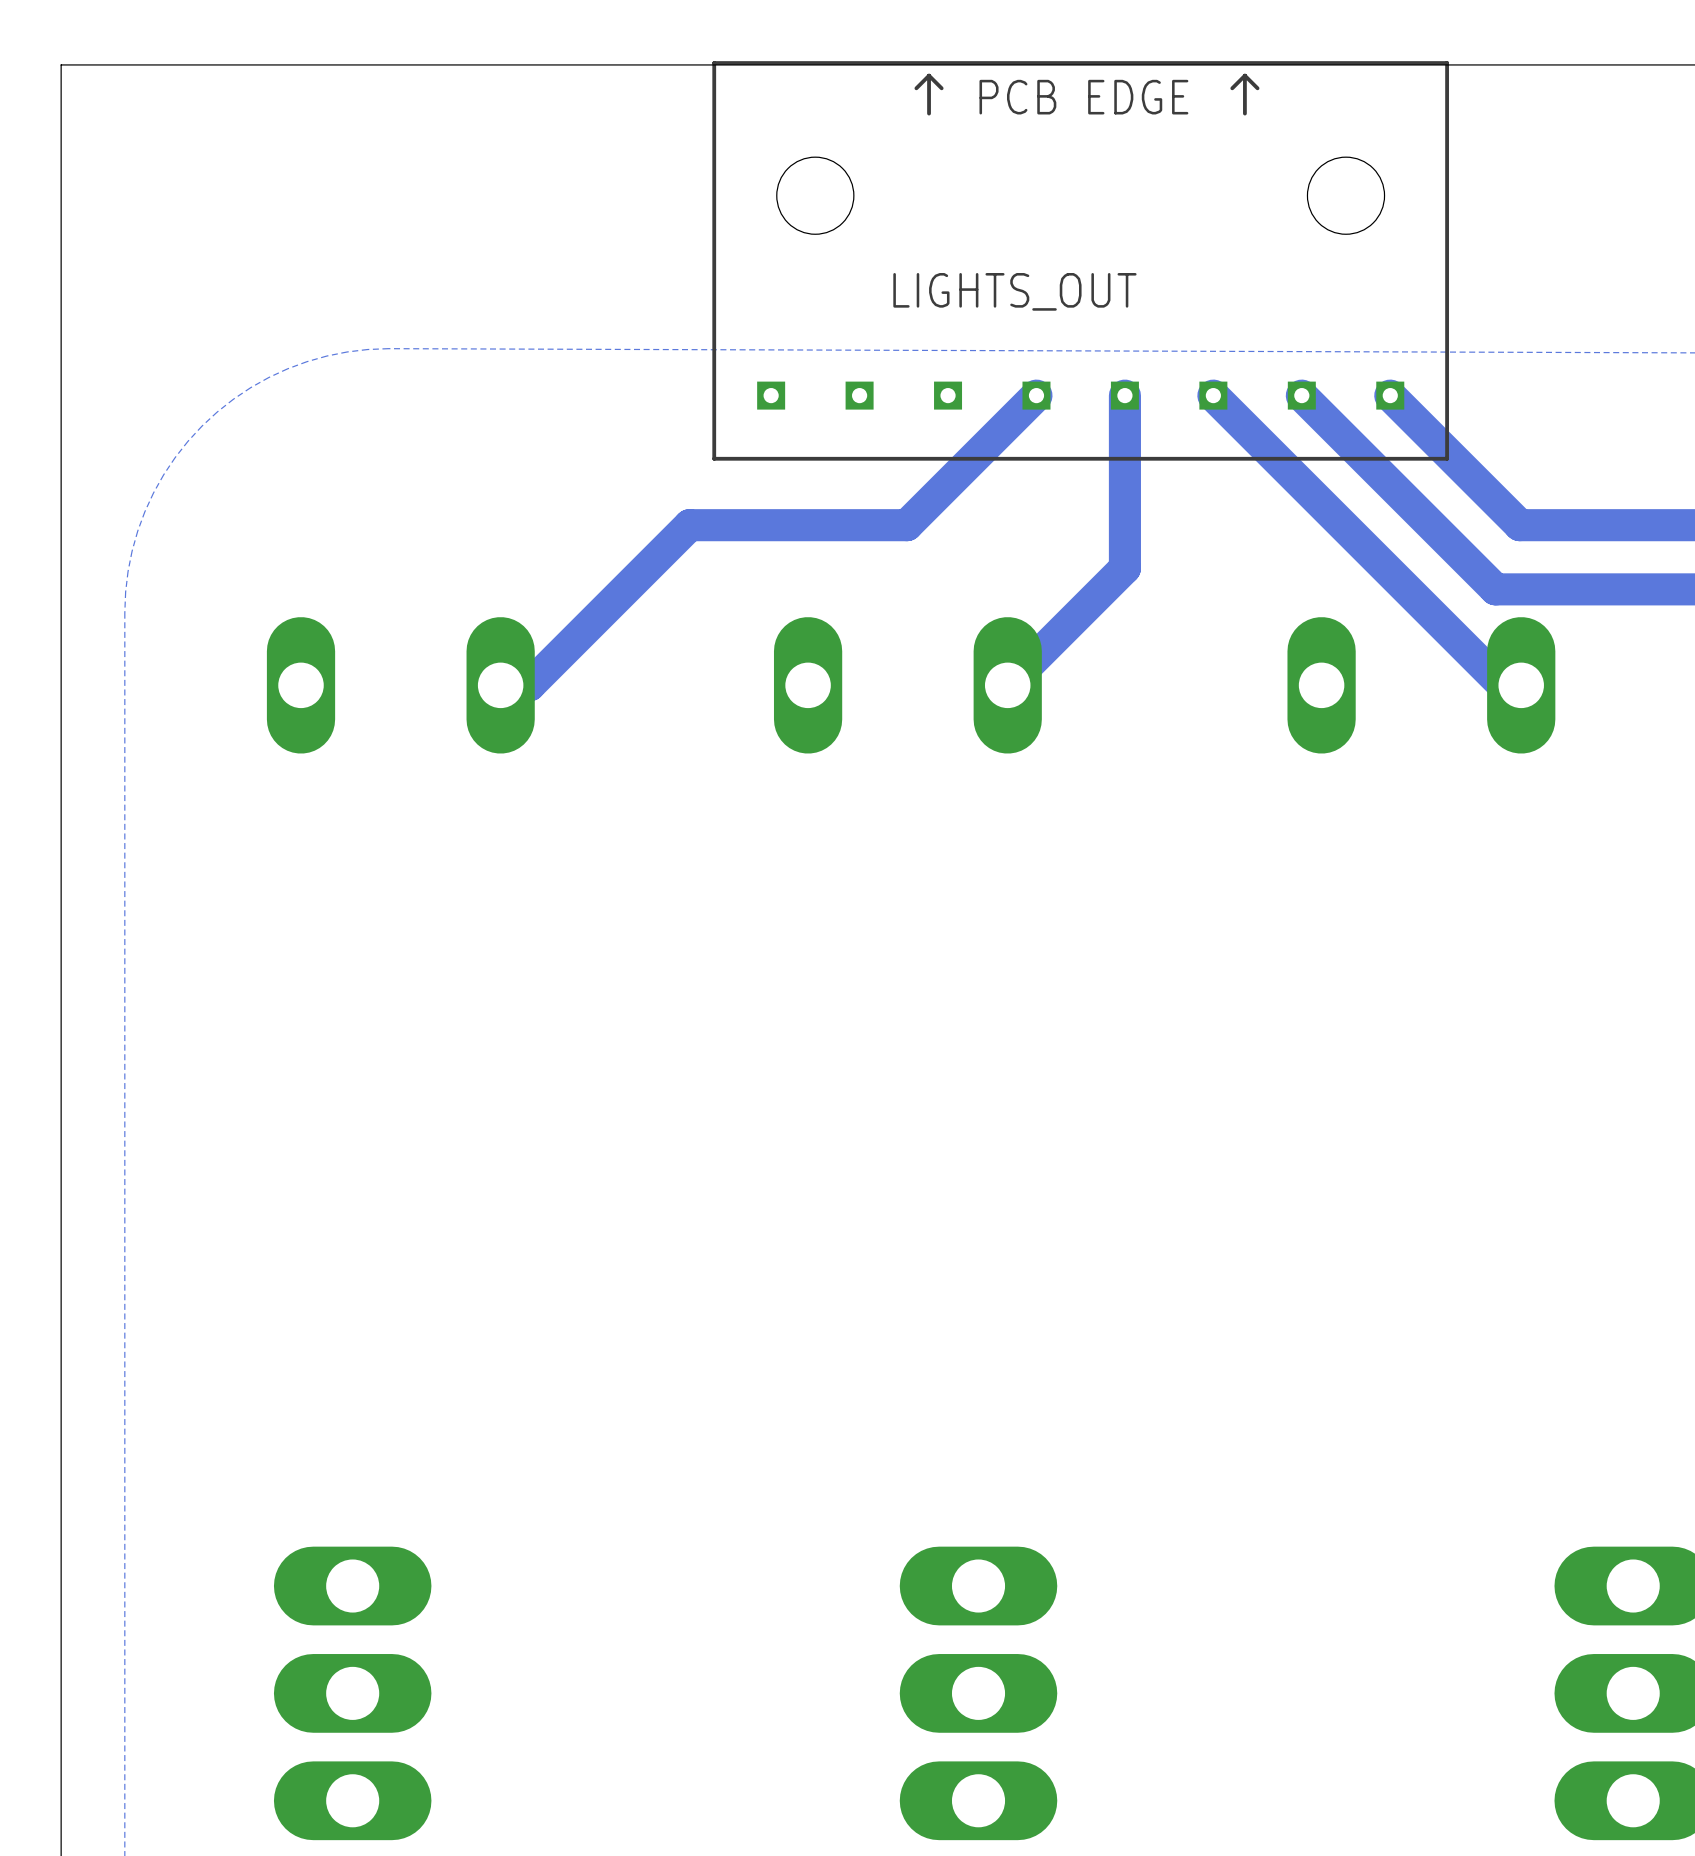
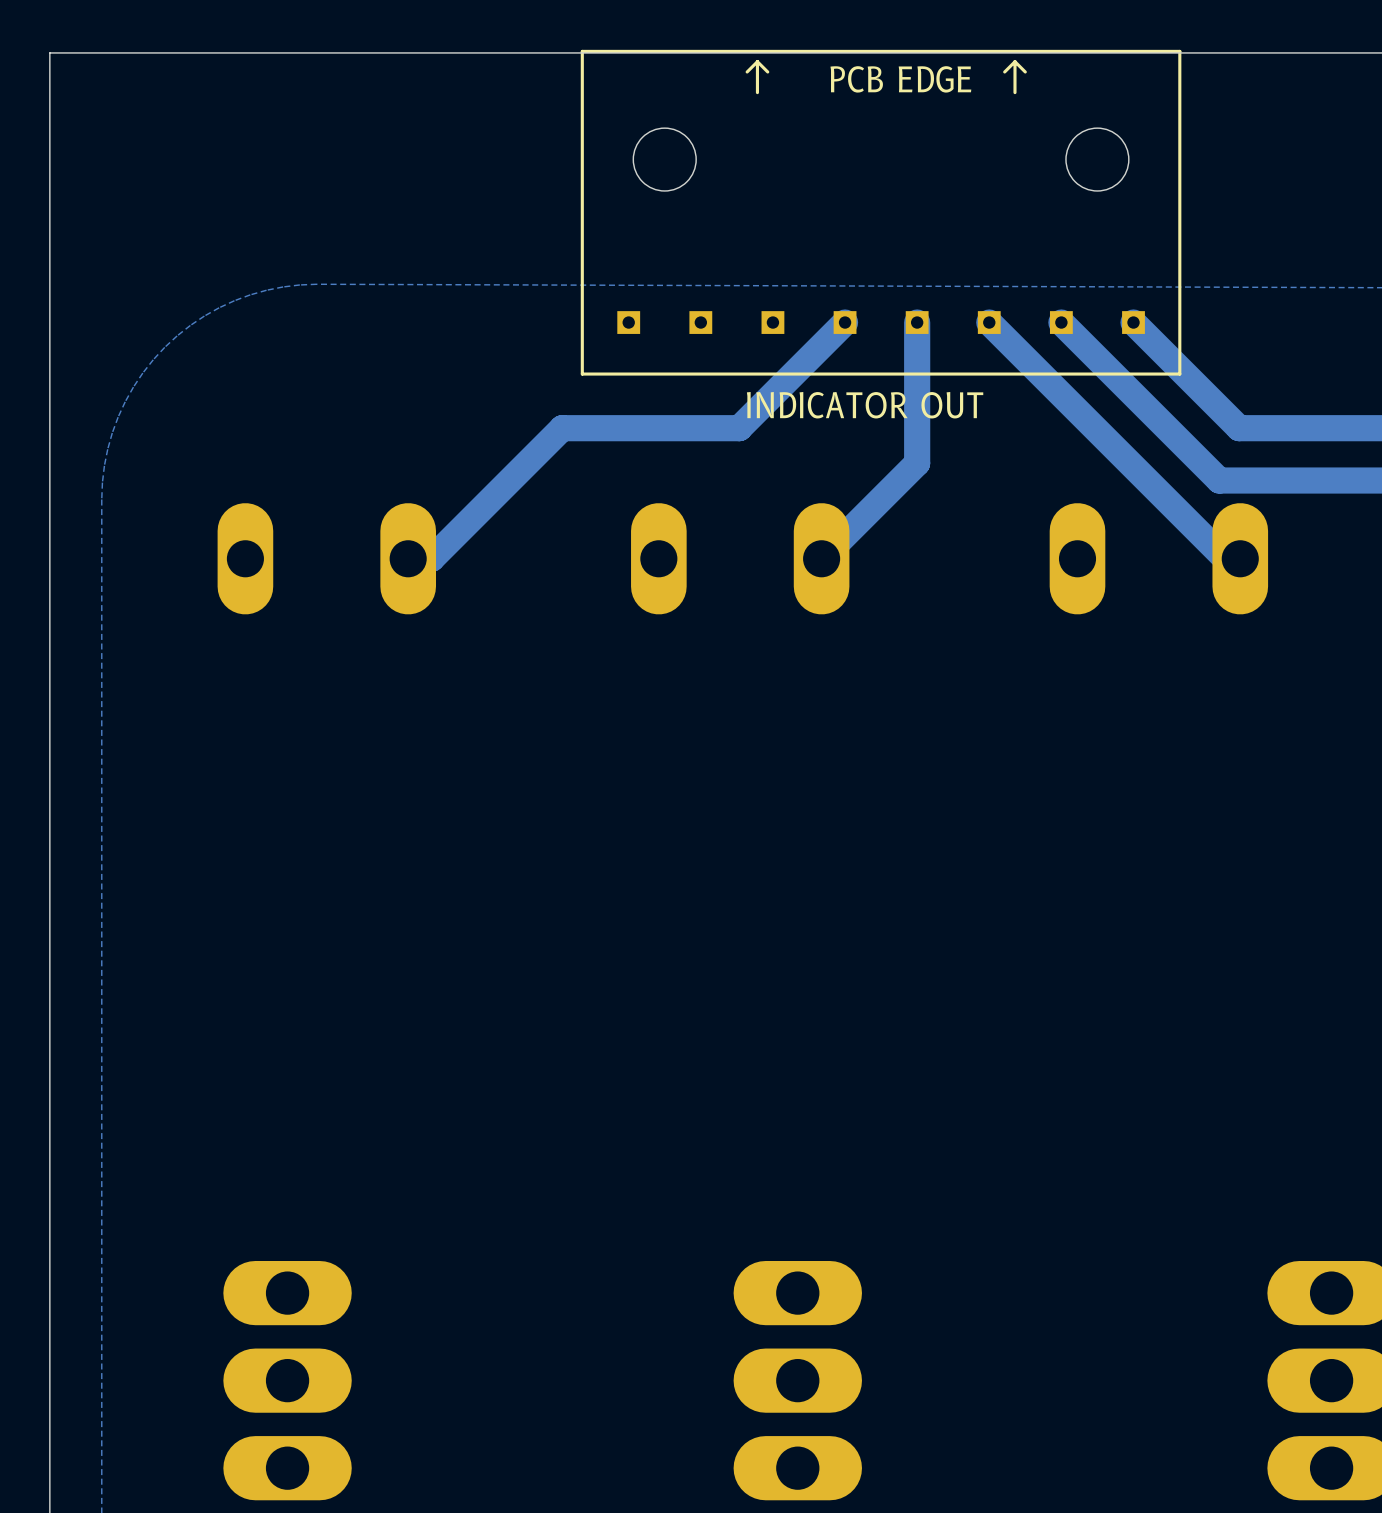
LIGHTS_OUT name: LIGHTS_OUT (1014, 291) -> none
text: none -> INDICATOR OUT (865, 405)

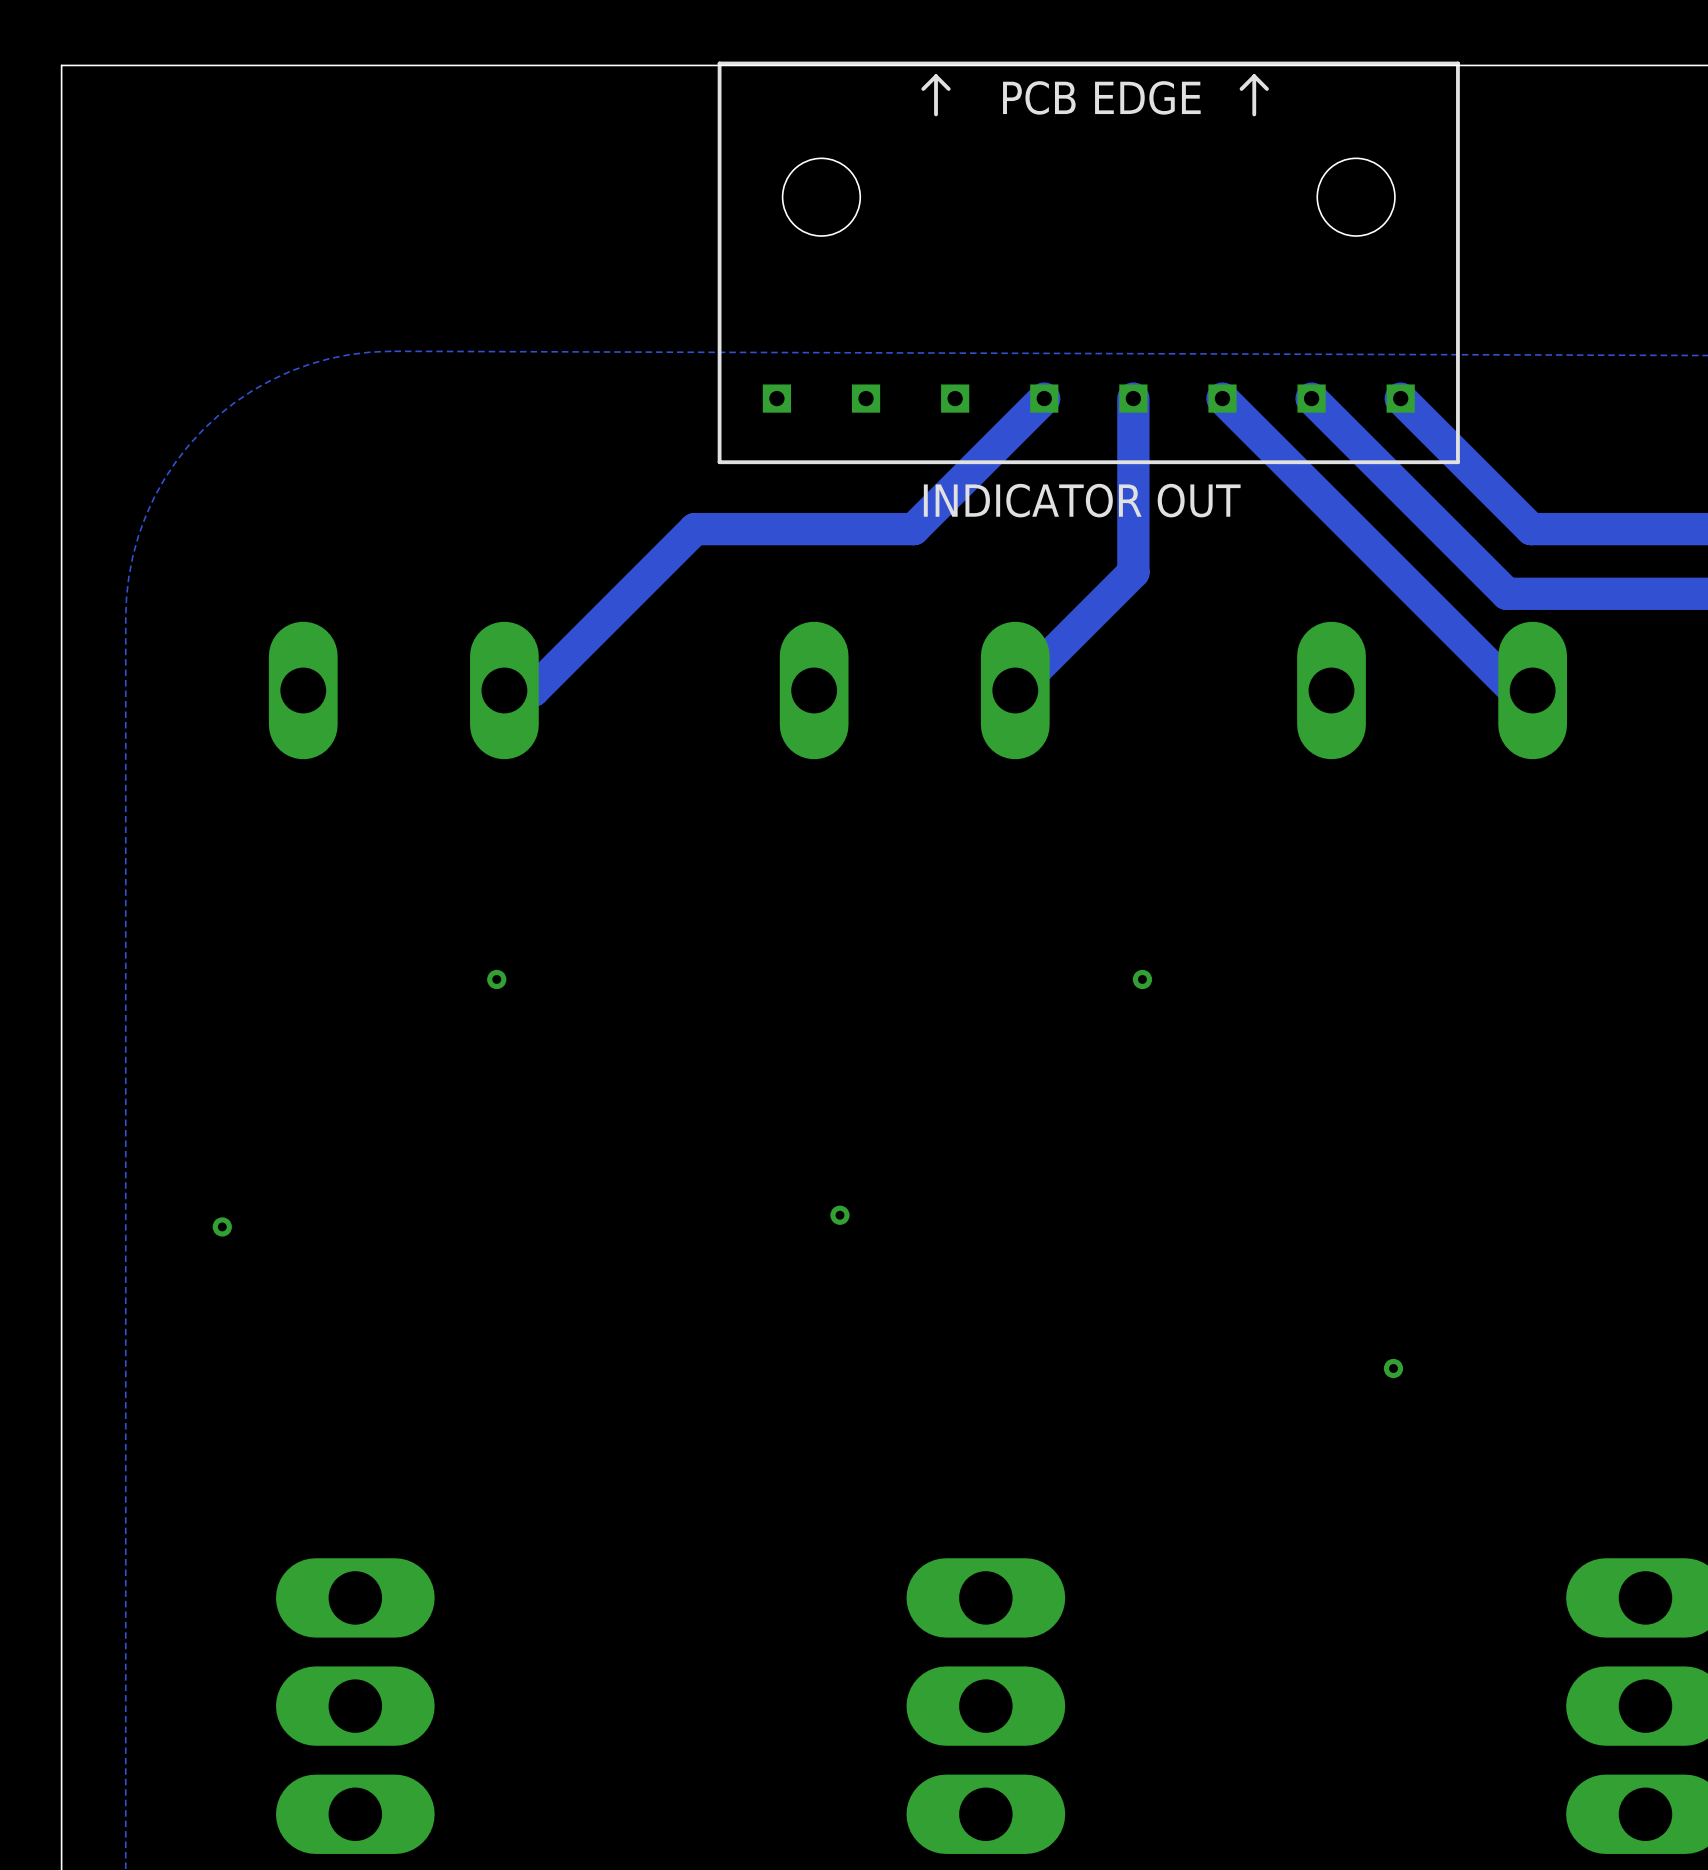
via: none -> (496, 979)
via: none -> (1142, 979)
via: none -> (839, 1215)
via: none -> (222, 1226)
via: none -> (1393, 1368)

